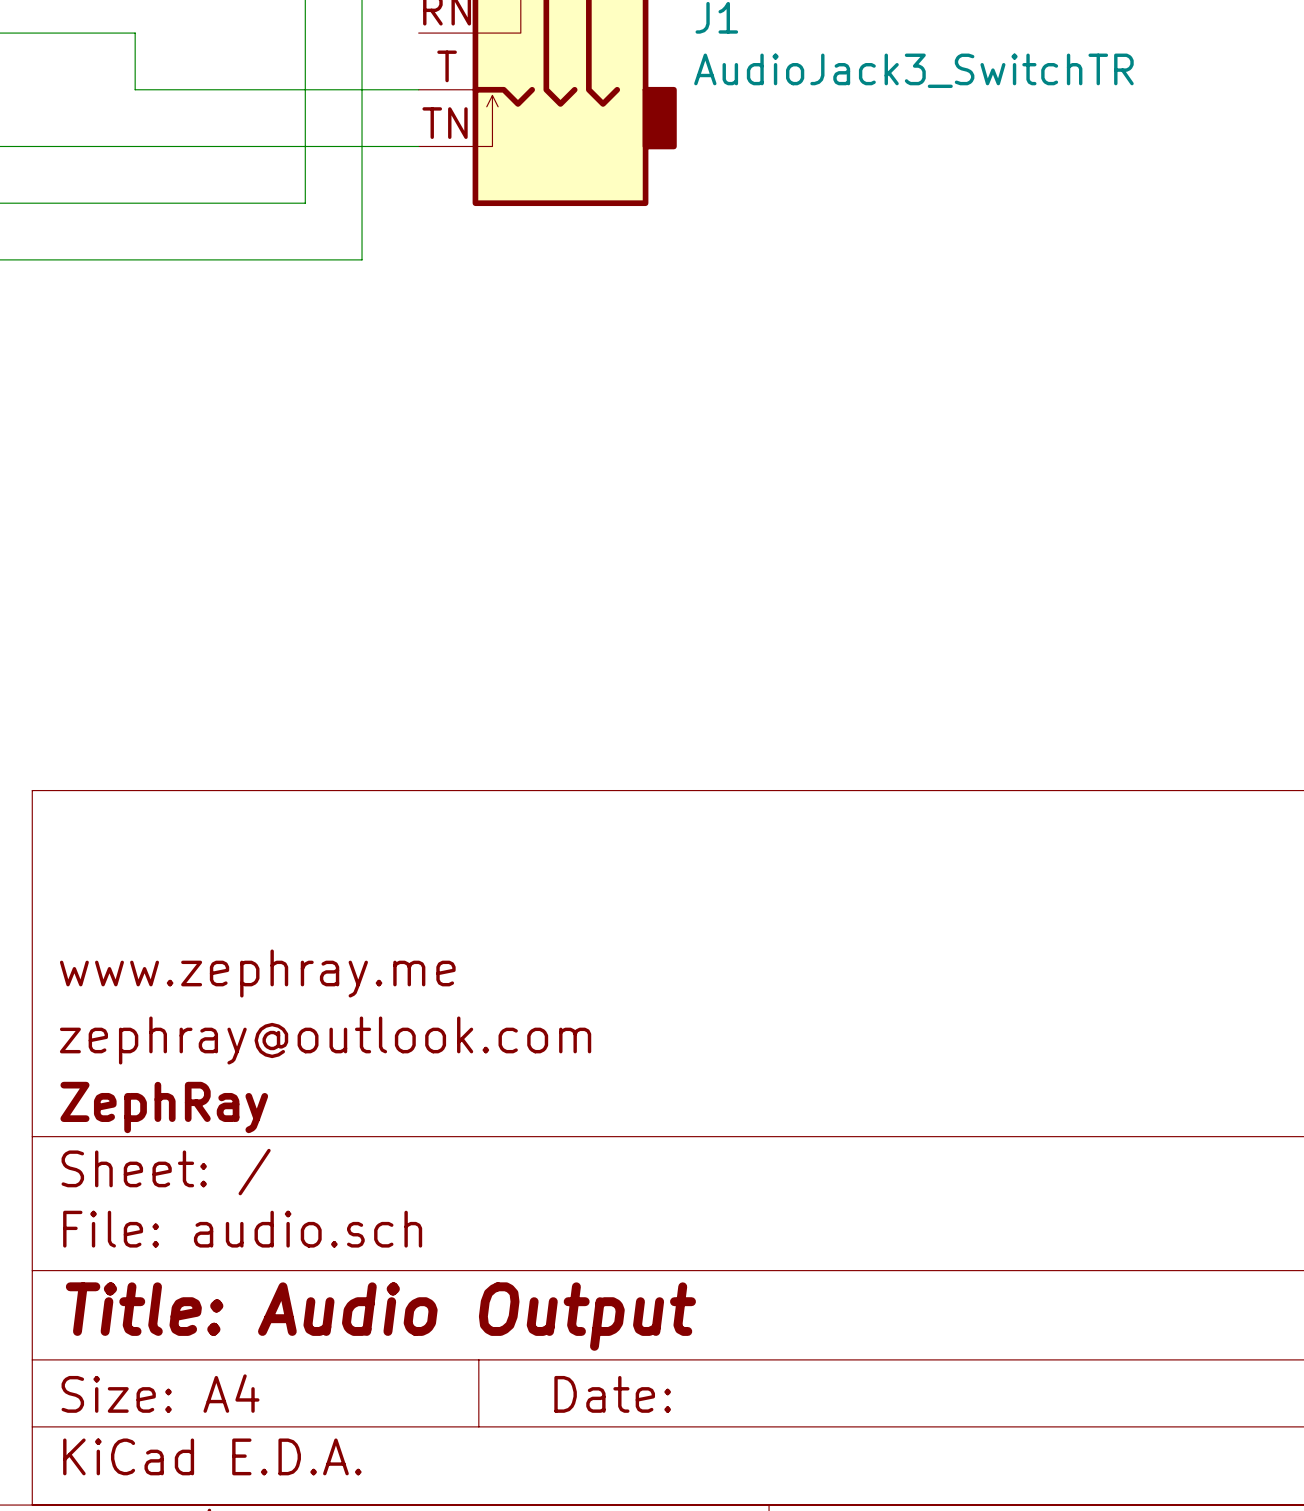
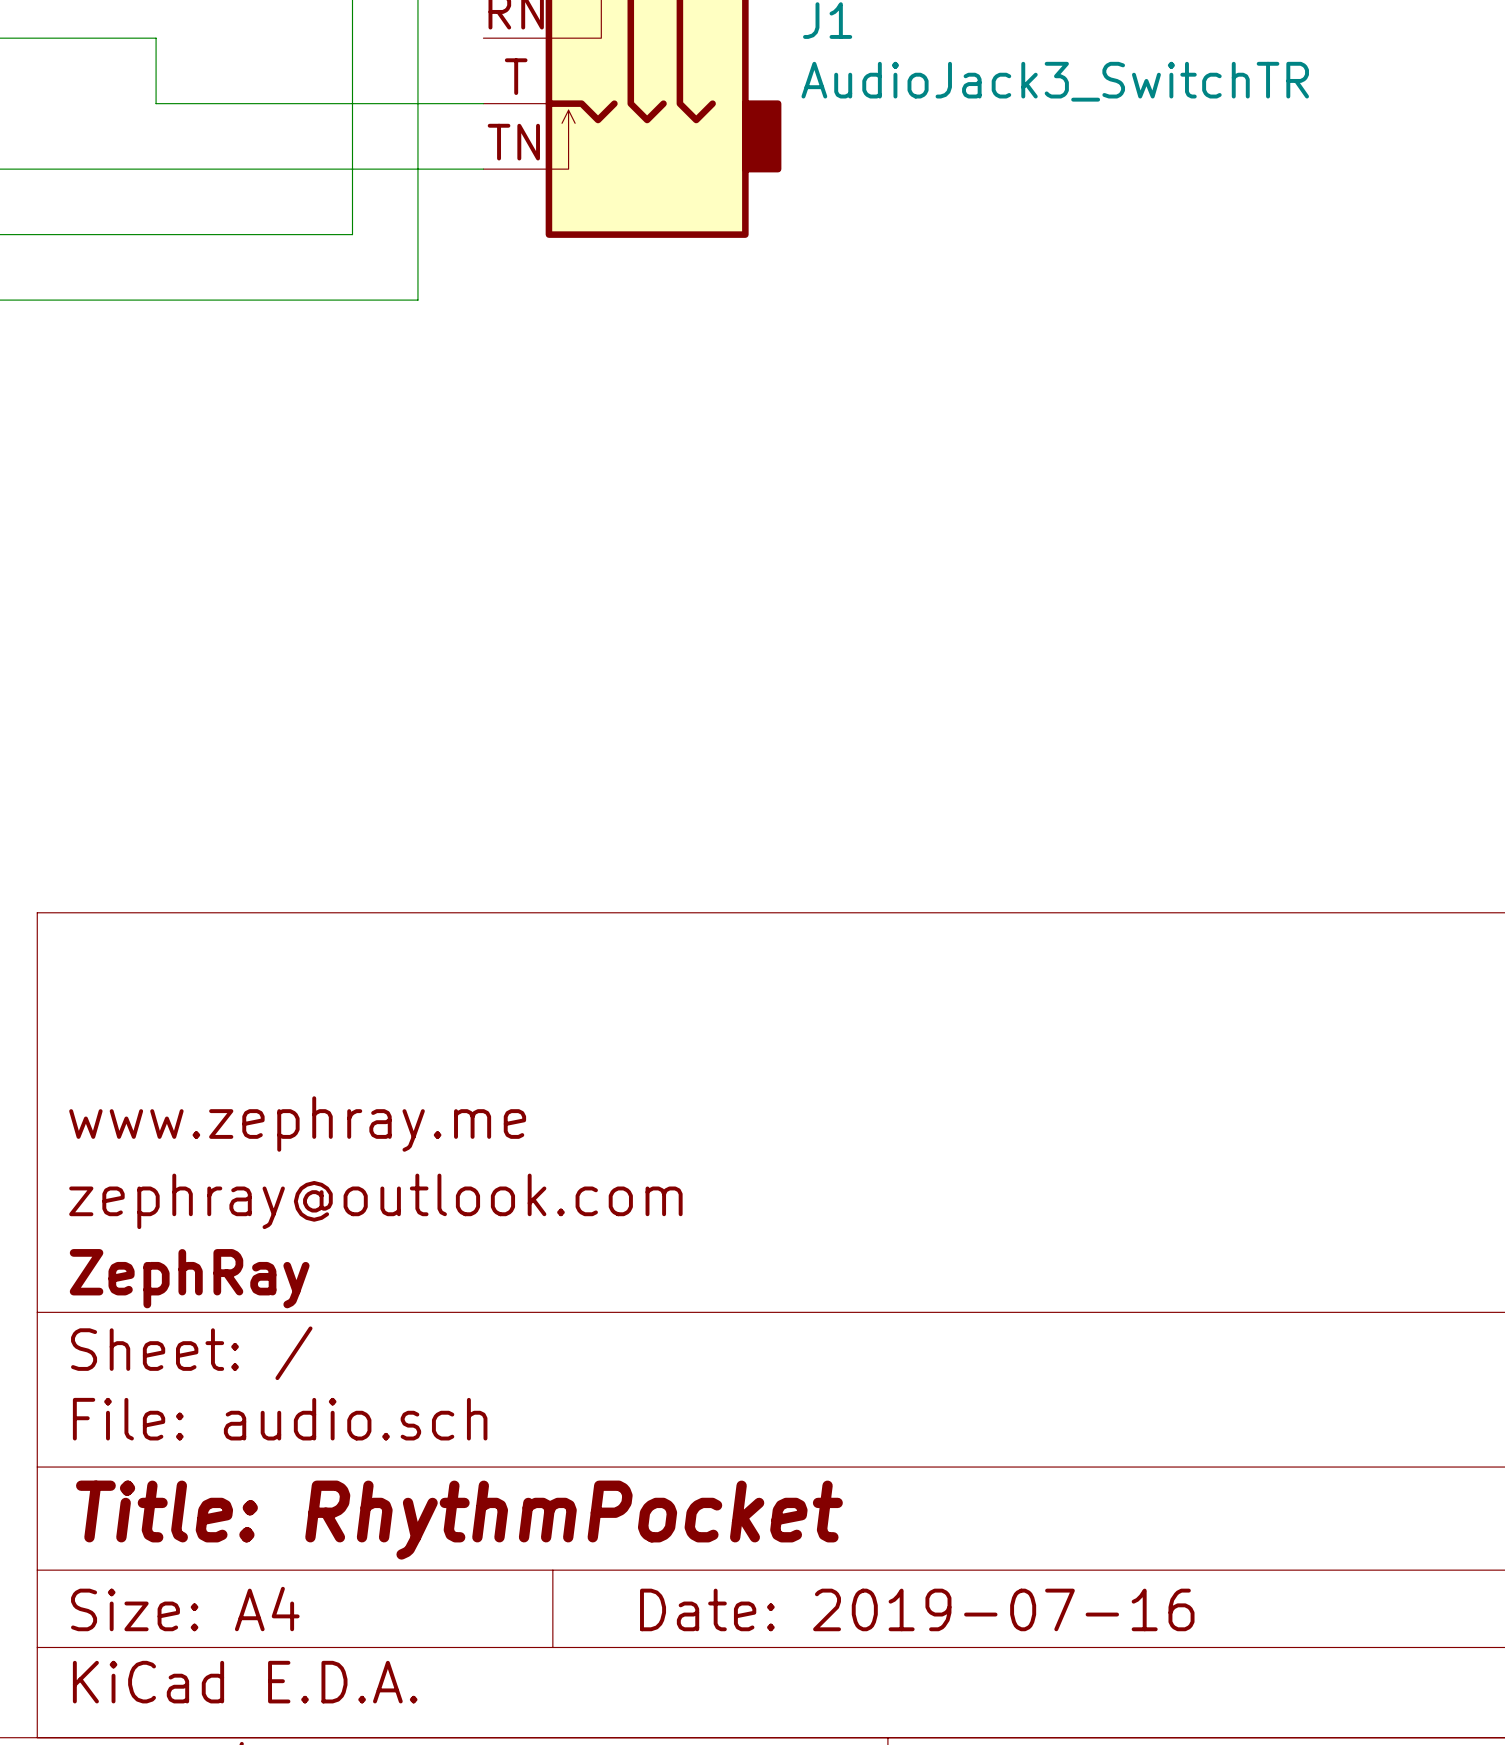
title block: Title: Audio Output (380, 1316) -> Title: RhythmPocket (459, 1520)
title block: Date: (612, 1394) -> Date: 2019-07-16 (917, 1609)

